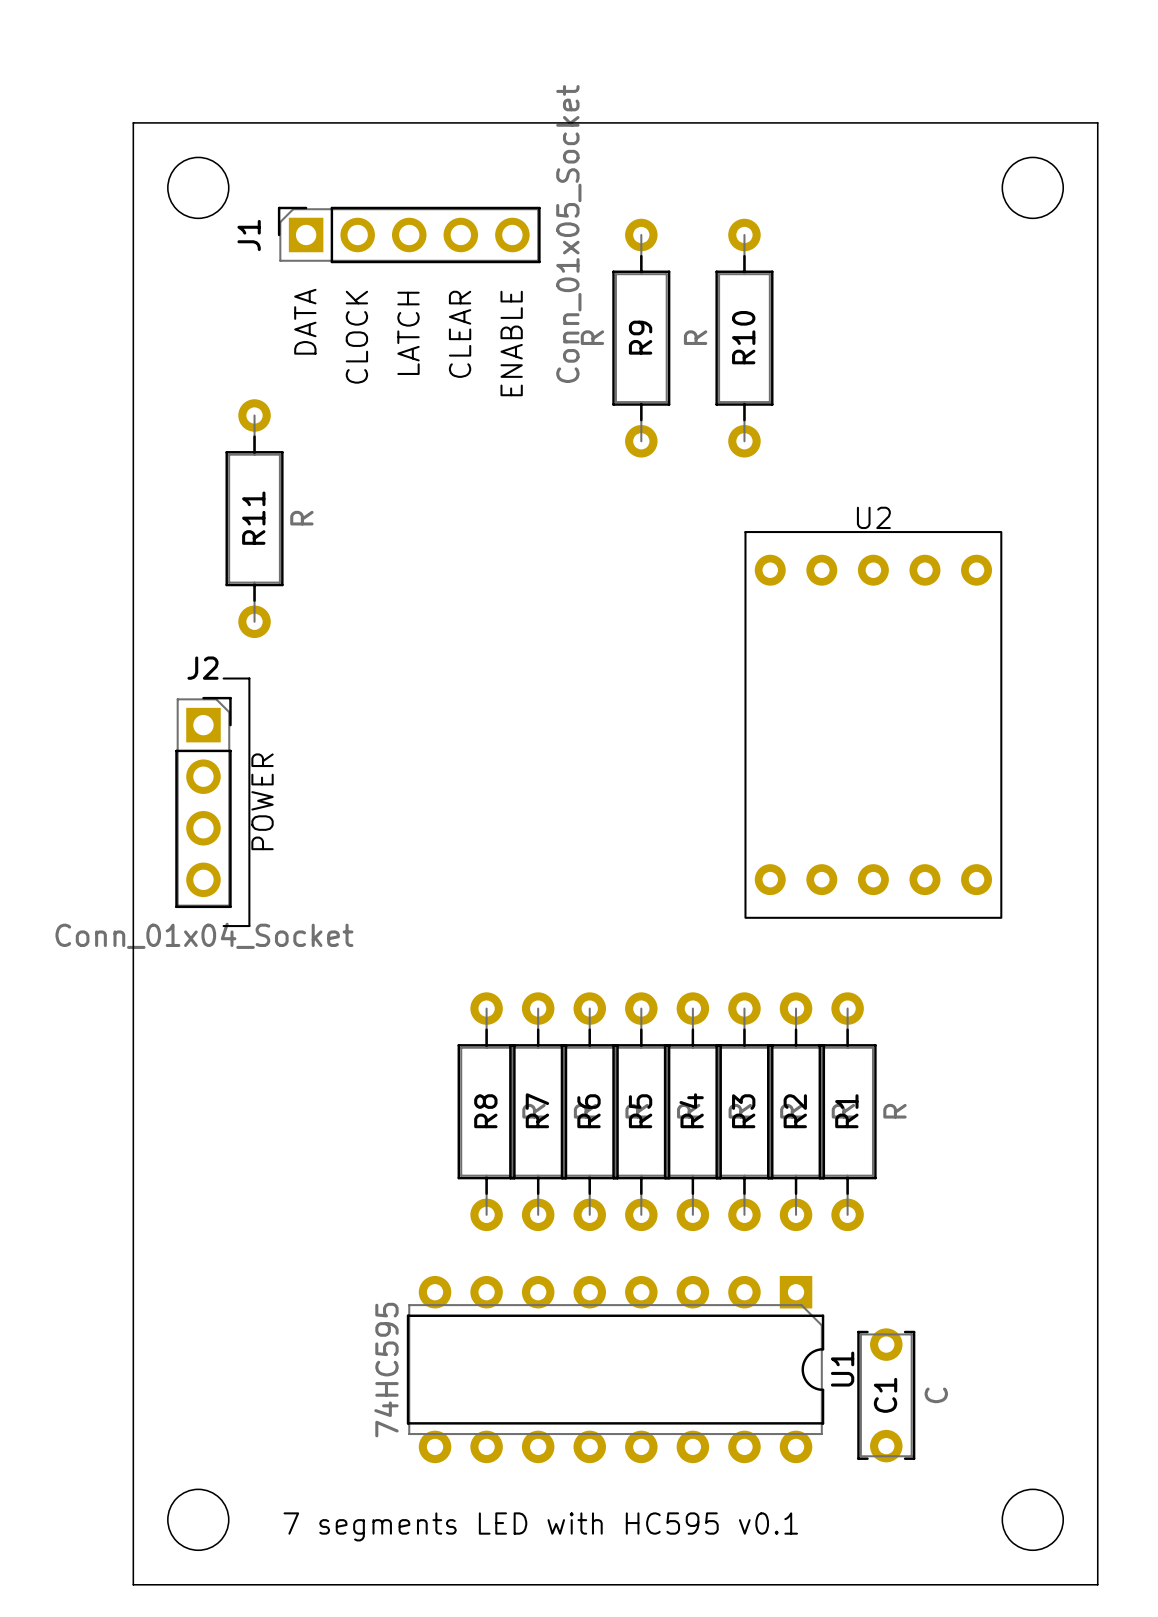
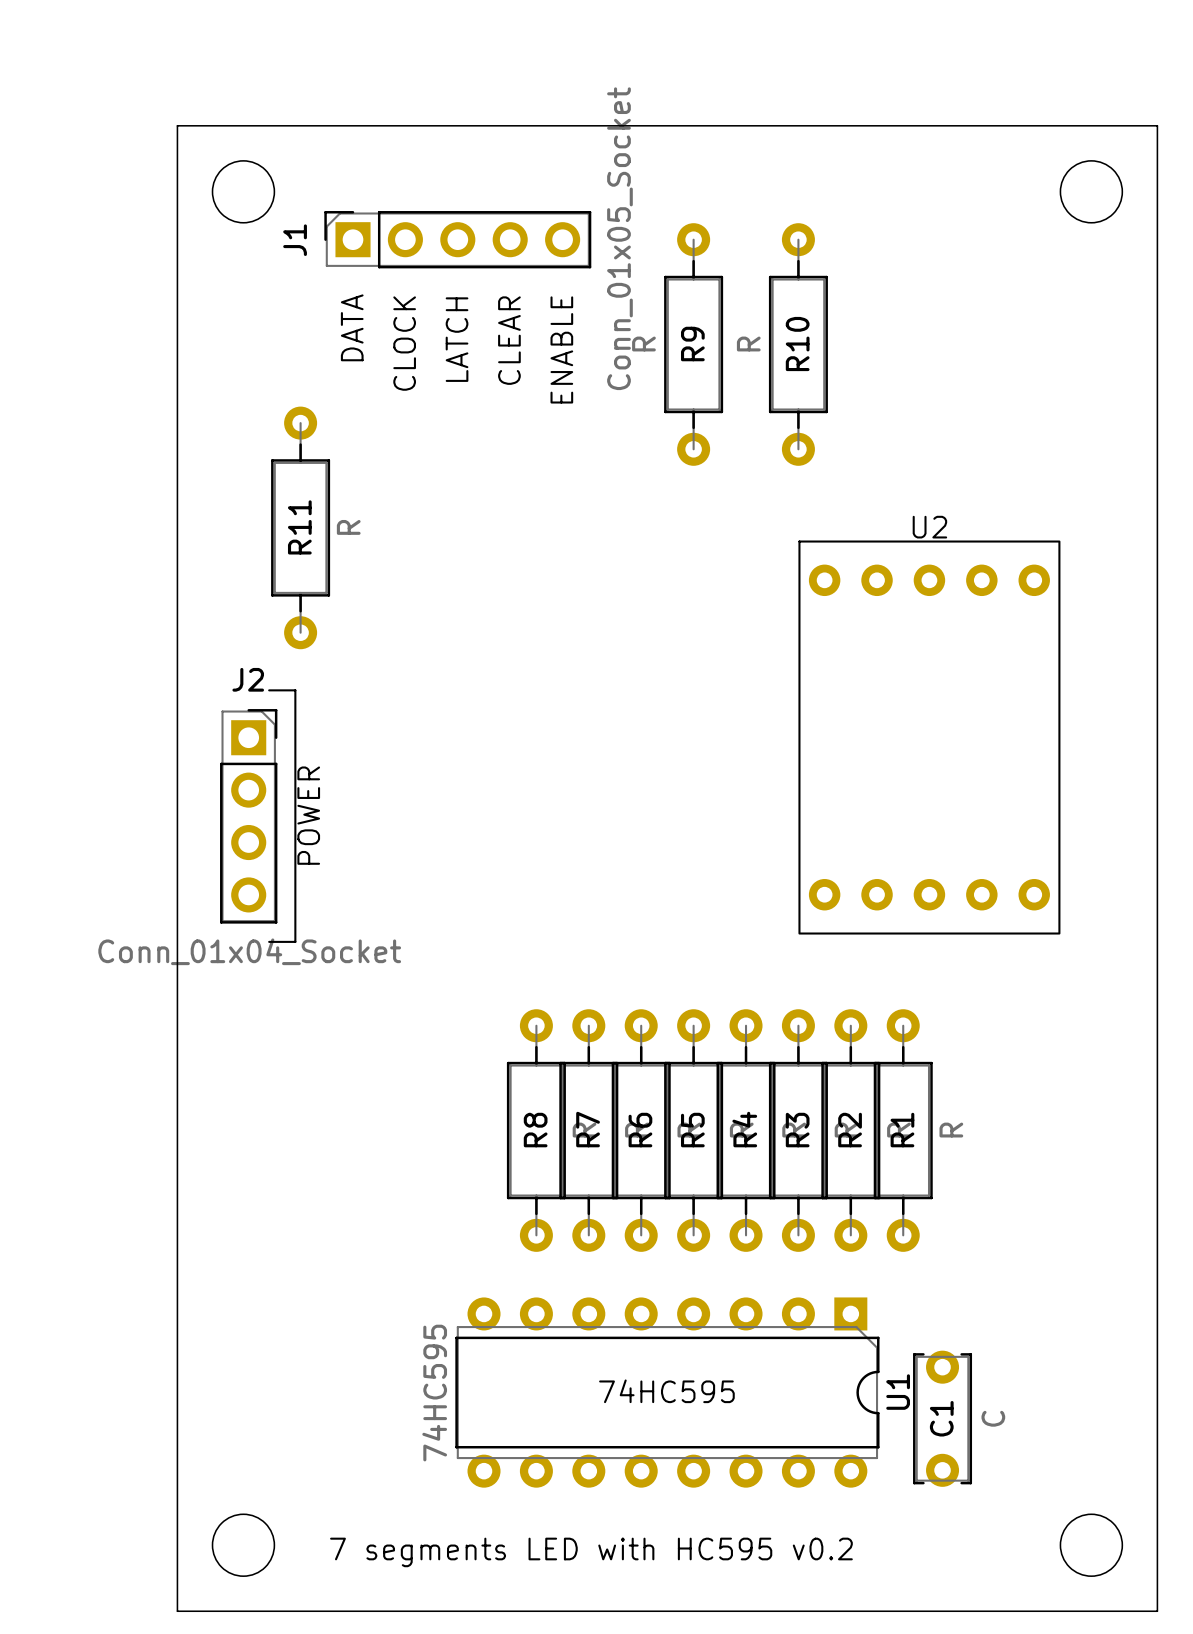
text: none -> 74HC595 (666, 1391)
text: 7 segments LED with HC595 v0.1 (540, 1526) -> 7 segments LED with HC595 v0.2 (591, 1552)

